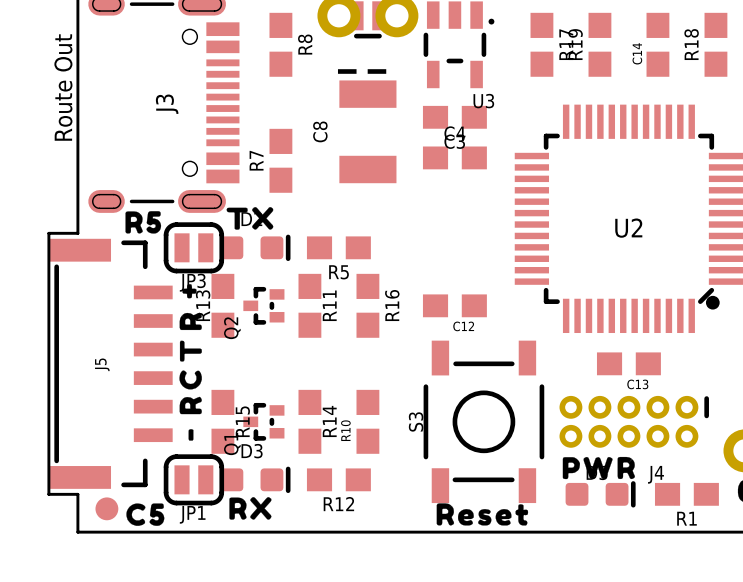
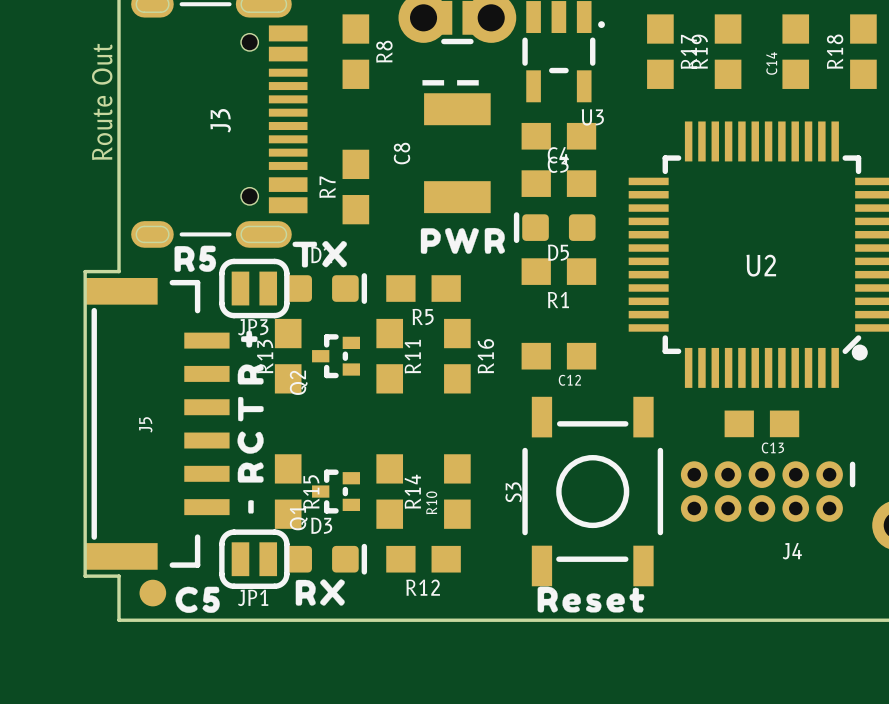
drawing position: (598, 468) -> (462, 240)
D5 rotation: 0° (600, 494) -> 180° (554, 227)
D5 position: (600, 494) -> (554, 227)
R1 position: (686, 494) -> (558, 271)

